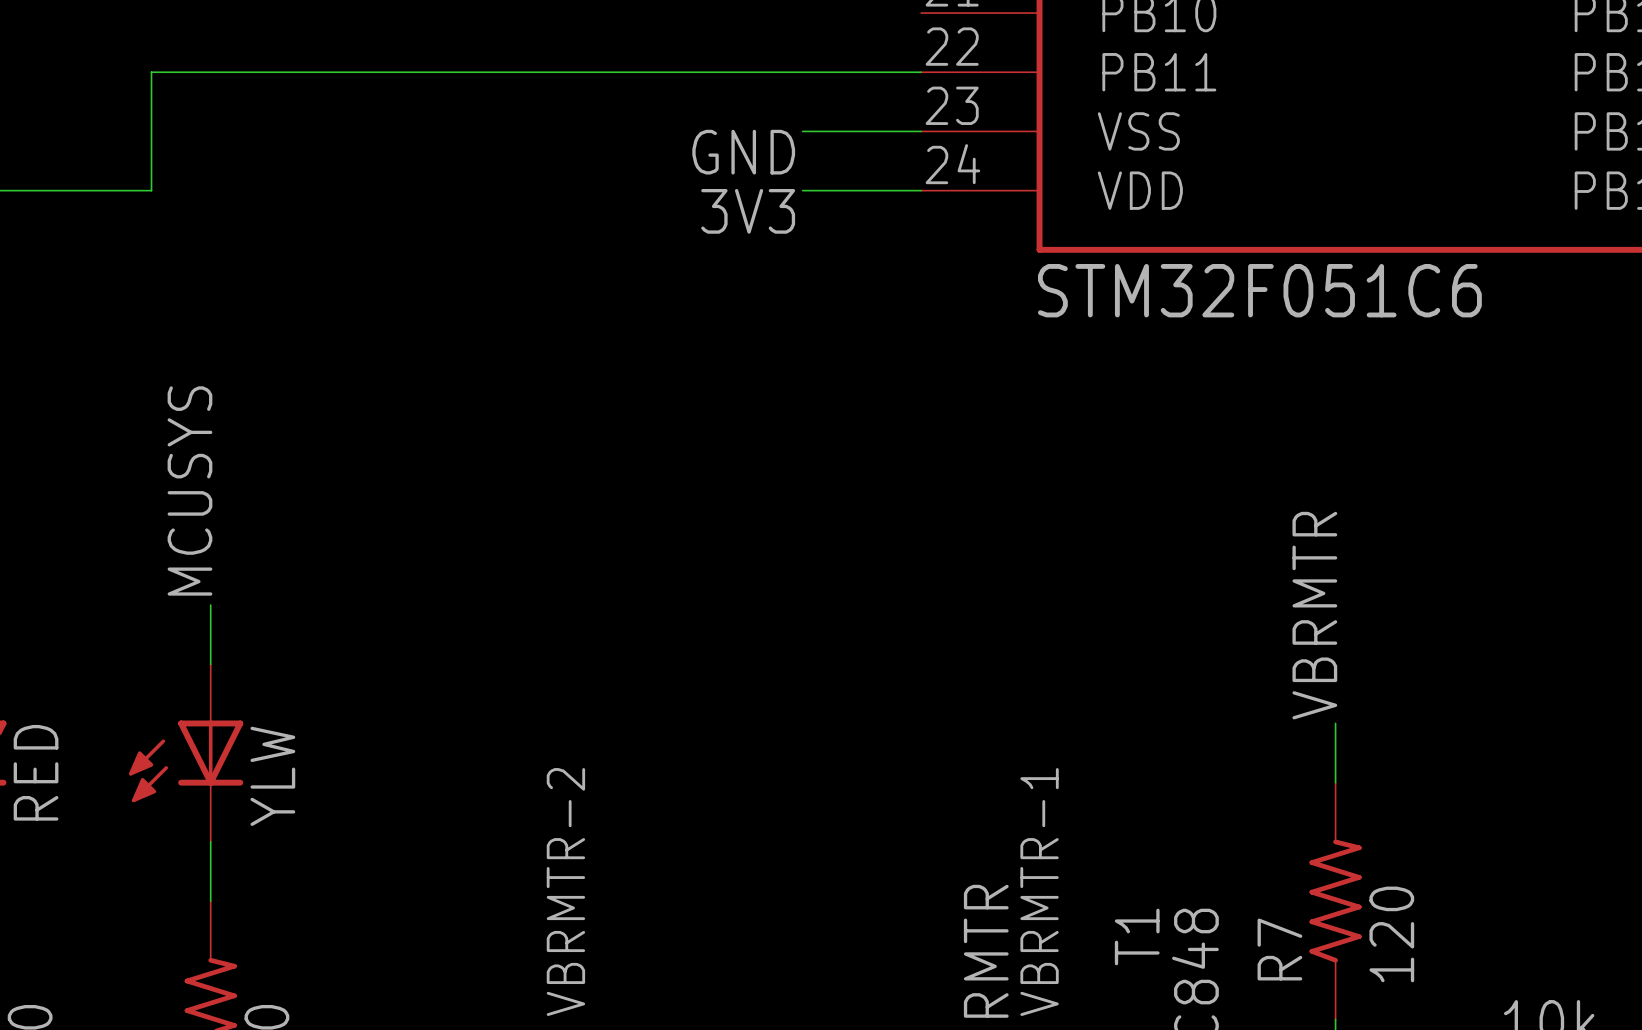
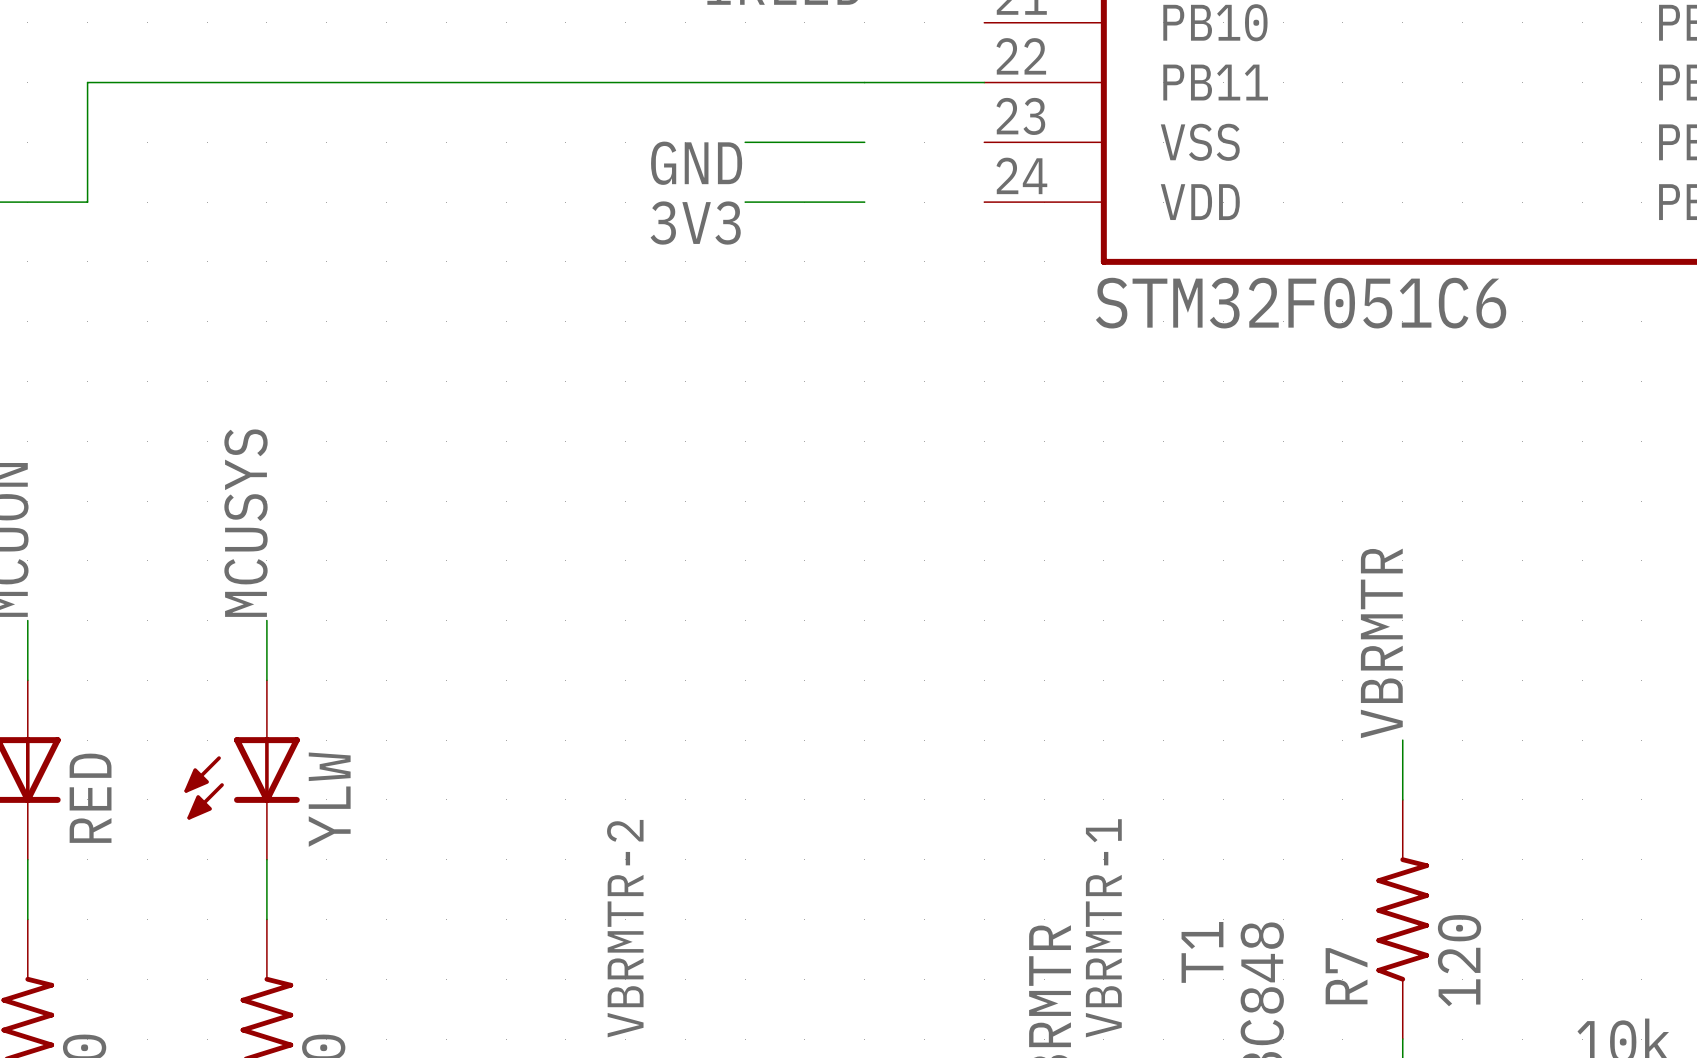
wire: (151, 72) (151, 190) (33, 190) -> (207, 82) (87, 82) (87, 202)
wire: (802, 131) (921, 131) -> (864, 142) (745, 142)
label position: GND (743, 152) -> GND (696, 163)
wire: (802, 190) (921, 190) -> (864, 202) (745, 202)
label position: 3V3 (748, 211) -> 3V3 (695, 223)

